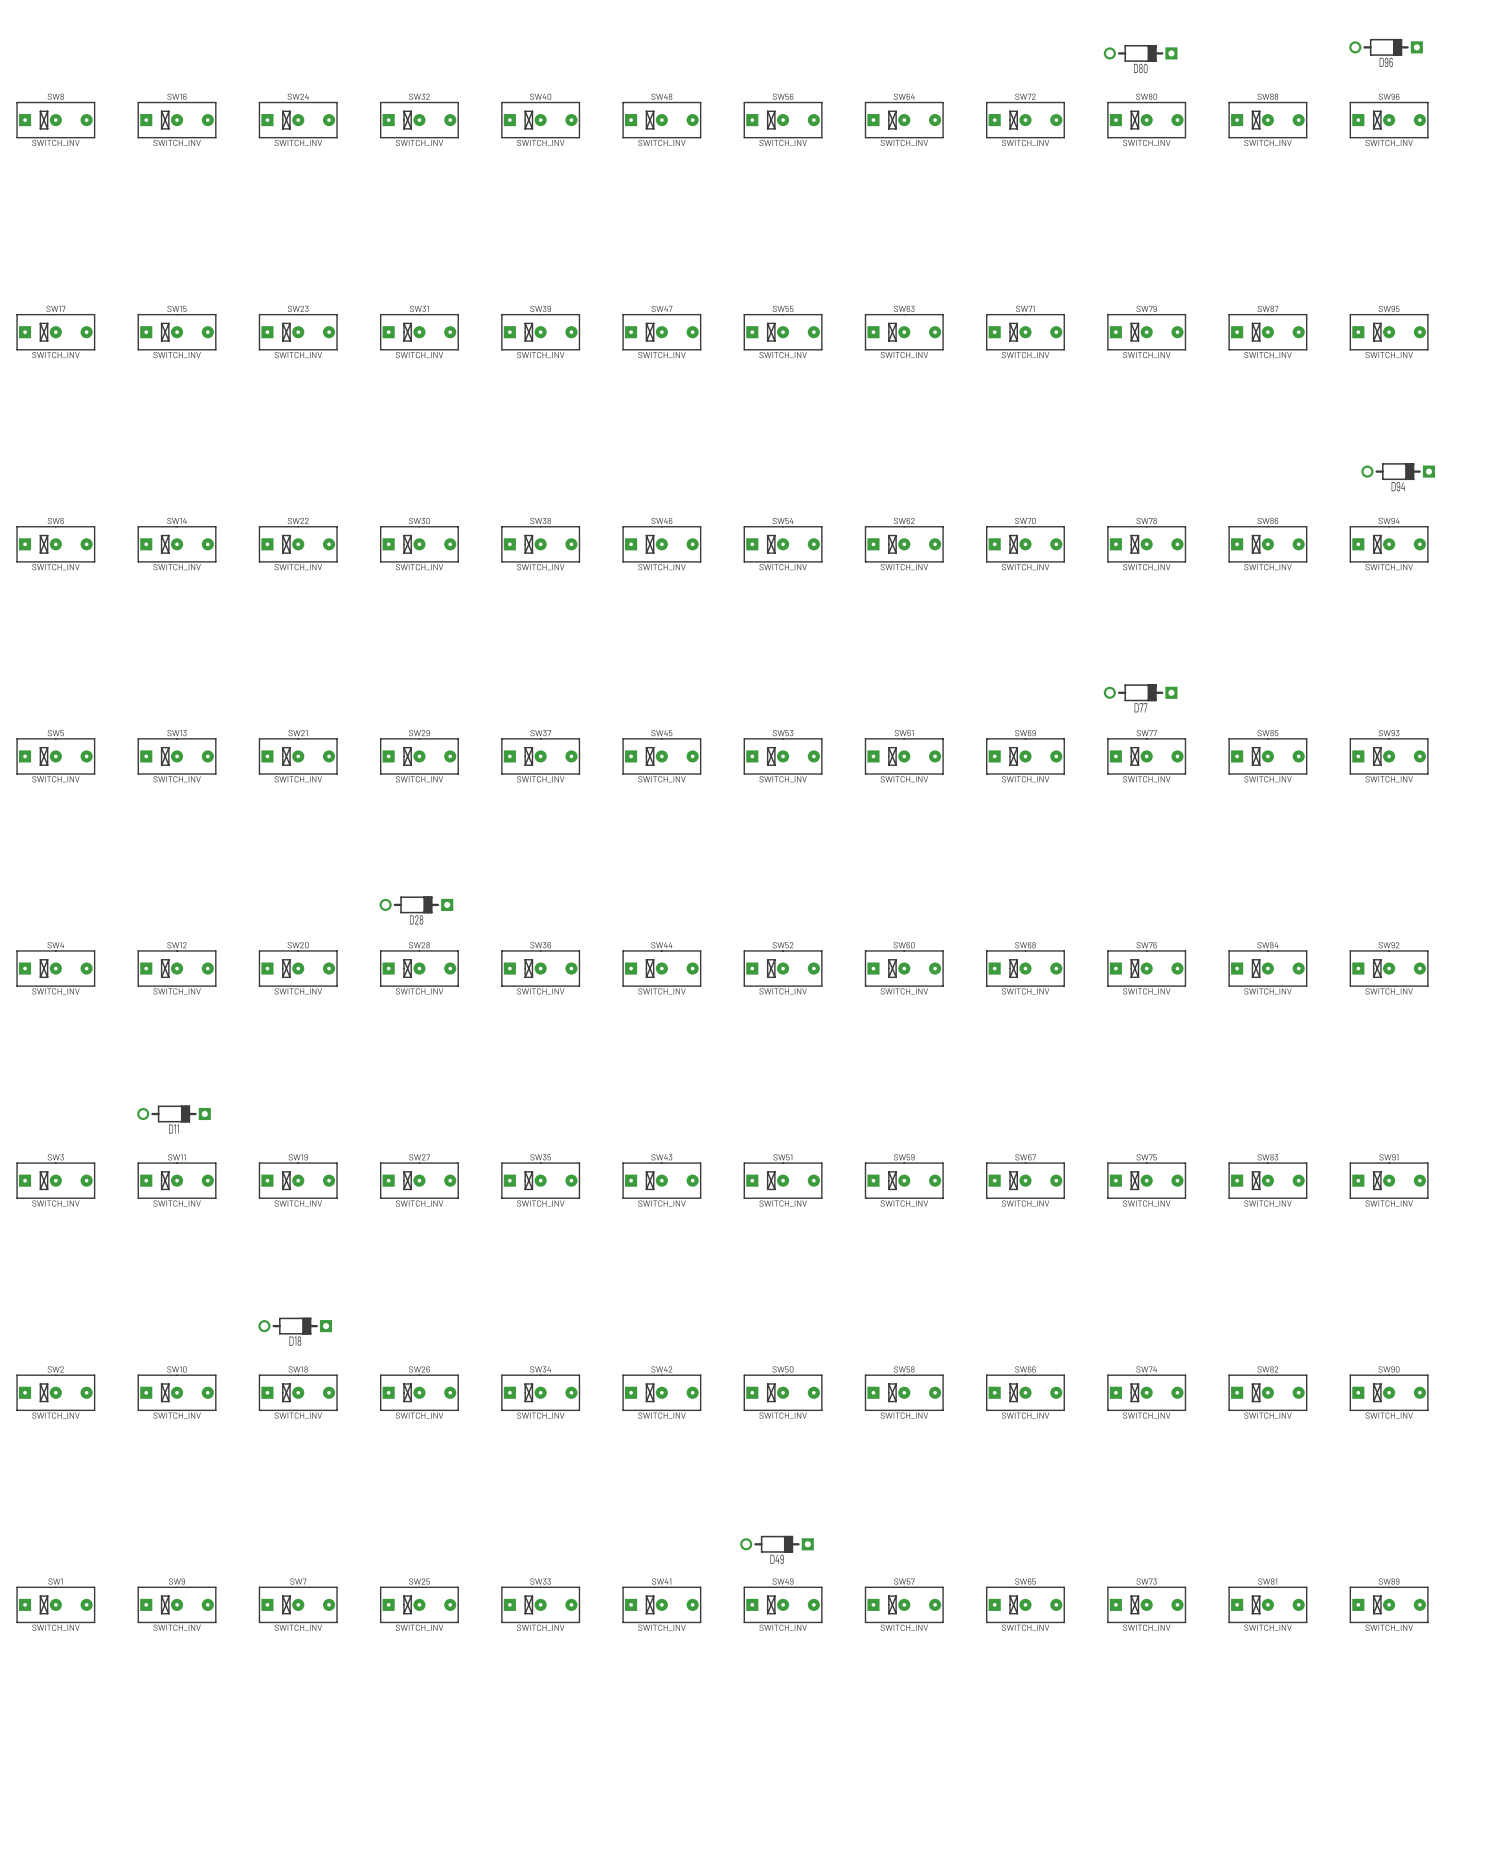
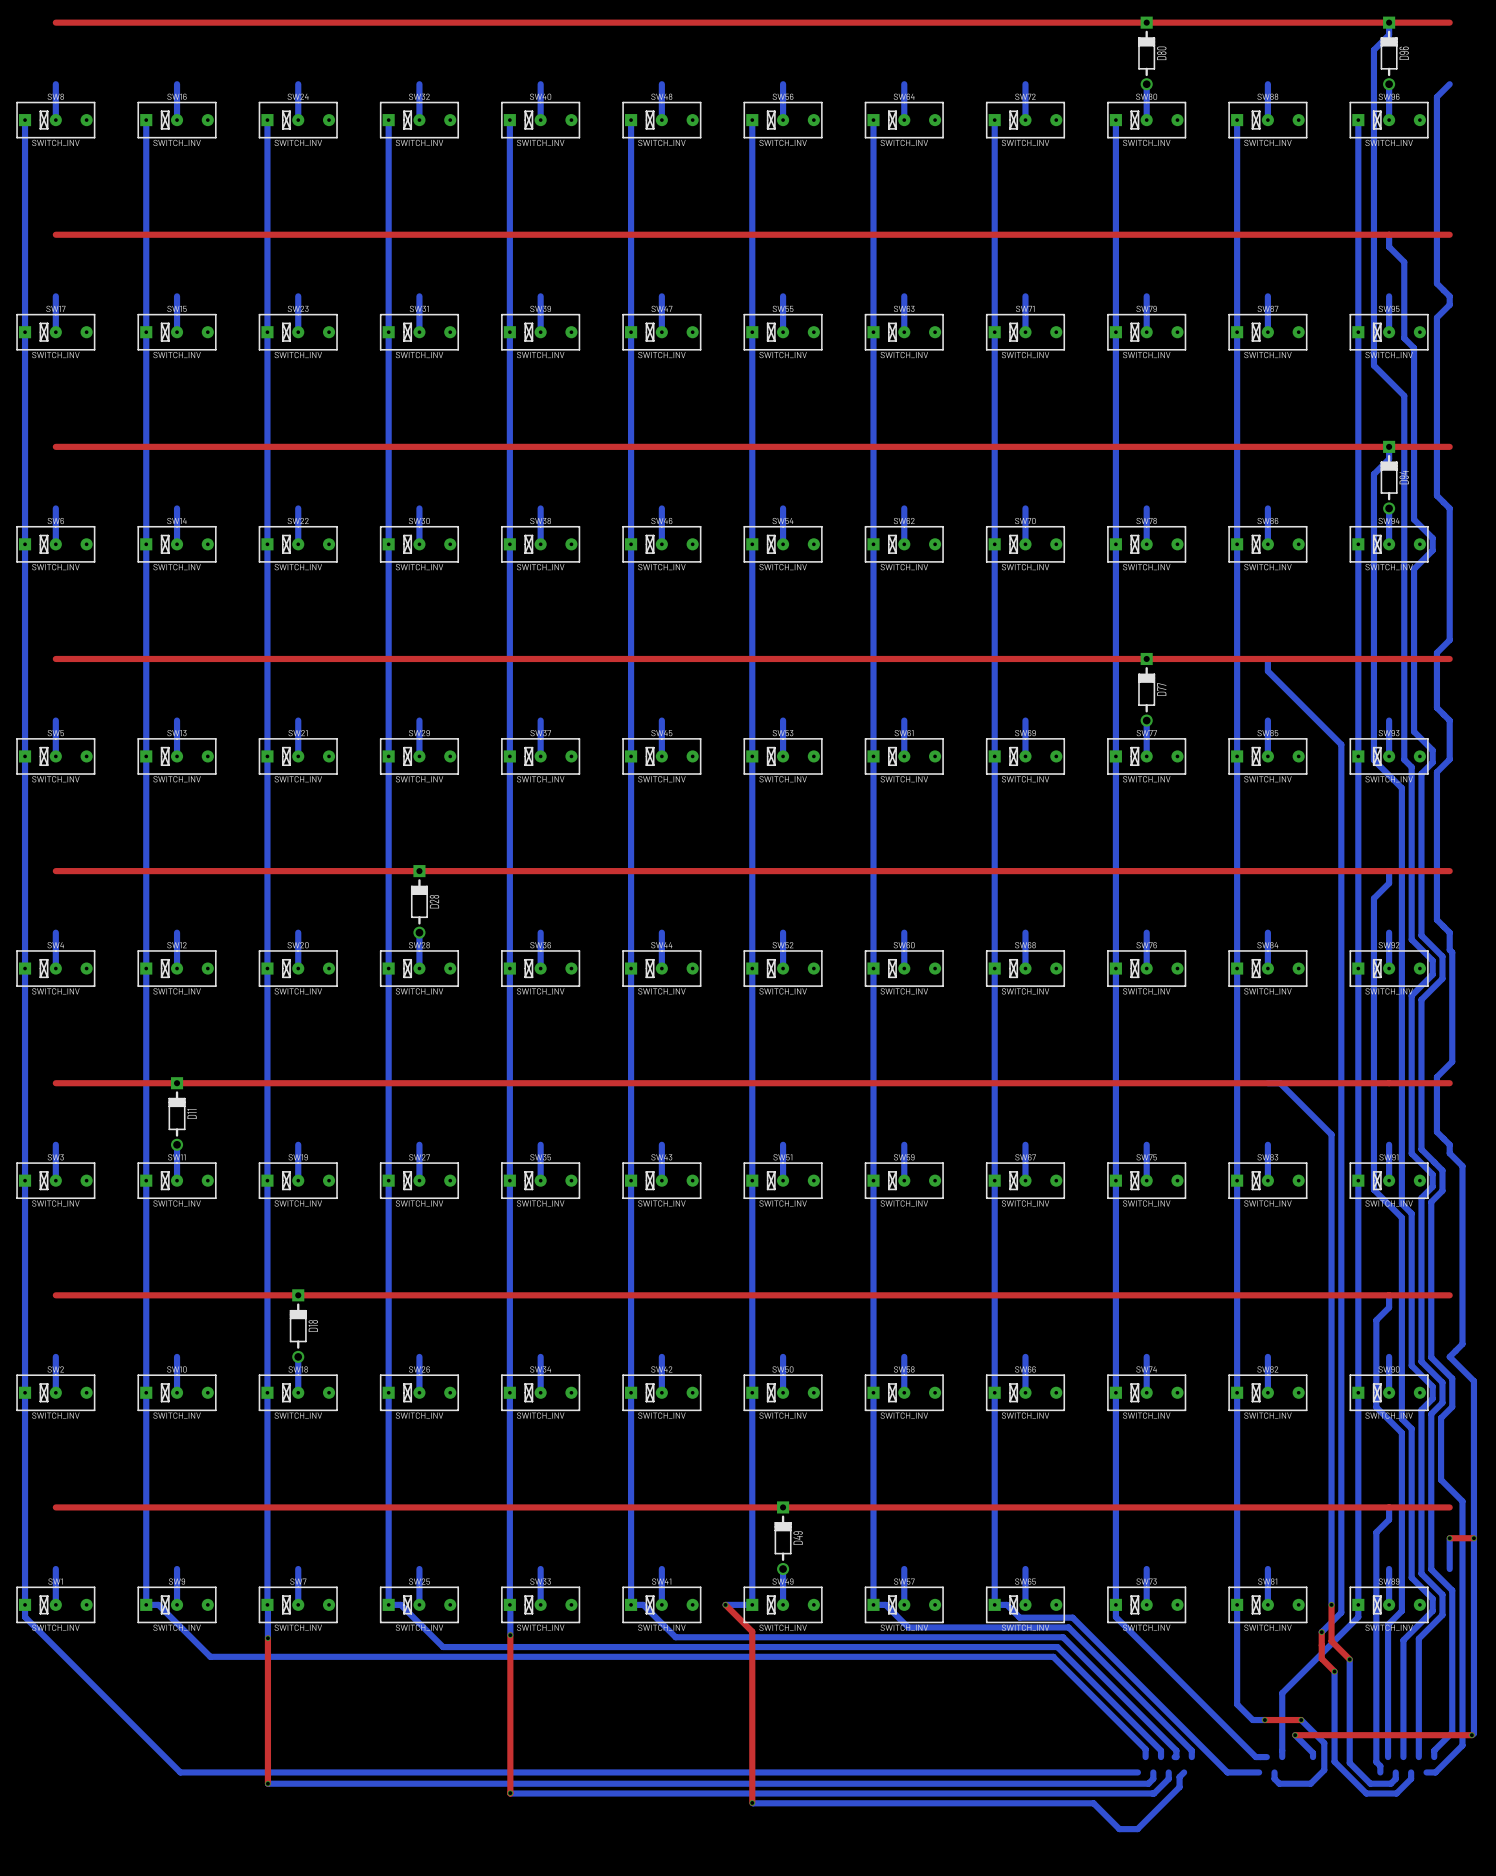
top track: none -> (55, 22) (1449, 22)
bottom track: none -> (1389, 22) (1389, 34) (1373, 50) (1373, 365) (1404, 395) (1404, 759) (1411, 767) (1411, 939) (1432, 960) (1432, 974) (1411, 995) (1411, 1153) (1432, 1174) (1432, 1186) (1421, 1197) (1421, 1361) (1442, 1382) (1442, 1402) (1431, 1414) (1431, 1569) (1452, 1590) (1452, 1732) (1434, 1750) (1434, 1757)
D96 rotation: 0° (1386, 47) -> 90° counterclockwise (1389, 53)
D80 rotation: 0° (1140, 53) -> 90° counterclockwise (1146, 53)
bottom track: none -> (55, 84) (55, 120)
bottom track: none -> (177, 84) (177, 120)
bottom track: none -> (298, 84) (298, 120)
bottom track: none -> (419, 84) (419, 120)
bottom track: none -> (540, 84) (540, 120)
bottom track: none -> (661, 84) (661, 120)
bottom track: none -> (783, 84) (783, 120)
bottom track: none -> (904, 84) (904, 120)
bottom track: none -> (1025, 84) (1025, 120)
bottom track: none -> (1146, 84) (1146, 120)
bottom track: none -> (1267, 84) (1267, 120)
bottom track: none -> (1389, 84) (1389, 120)
bottom track: none -> (1449, 84) (1436, 96) (1436, 283) (1449, 296) (1449, 304) (1436, 317) (1436, 495) (1449, 508) (1449, 640) (1436, 652) (1436, 707) (1449, 720) (1449, 759) (1436, 772) (1436, 919) (1449, 932) (1449, 949) (1452, 952) (1452, 1061) (1436, 1077) (1436, 1132) (1449, 1144) (1449, 1153) (1462, 1166) (1462, 1344) (1449, 1356) (1473, 1381) (1473, 1733) (1472, 1735)
bottom track: none -> (25, 120) (25, 1617) (180, 1772) (1137, 1772)
bottom track: none -> (146, 120) (146, 1604) (158, 1604) (210, 1656) (1053, 1656) (1145, 1749) (1145, 1757)
bottom track: none -> (267, 120) (267, 1638)
bottom track: none -> (388, 120) (388, 1604) (400, 1604) (443, 1647) (1057, 1647) (1161, 1750) (1161, 1757)
bottom track: none -> (509, 120) (510, 1635)
bottom track: none -> (631, 120) (631, 1604) (643, 1604) (675, 1637) (1063, 1637) (1176, 1750) (1176, 1757) (1174, 1757)
bottom track: none -> (752, 120) (752, 1604) (725, 1604)
bottom track: none -> (873, 120) (873, 1604) (885, 1604) (908, 1627) (1068, 1627) (1191, 1750) (1191, 1757)
bottom track: none -> (994, 120) (994, 1604) (1006, 1604) (1019, 1617) (1072, 1617) (1227, 1772) (1259, 1772)
bottom track: none -> (1115, 120) (1115, 1617) (1255, 1757) (1266, 1757)
bottom track: none -> (1237, 120) (1237, 1704) (1252, 1720) (1264, 1720)
bottom track: none -> (1358, 120) (1358, 1617) (1282, 1693) (1282, 1757)
top track: none -> (55, 234) (1449, 234)
bottom track: none -> (1389, 234) (1389, 246) (1404, 262) (1404, 338) (1414, 348) (1414, 519) (1432, 538) (1432, 550) (1414, 569) (1414, 731) (1432, 750) (1432, 762) (1421, 773) (1421, 935) (1442, 956) (1442, 978) (1421, 999) (1421, 1149) (1434, 1162)
bottom track: none -> (55, 296) (55, 332)
bottom track: none -> (177, 296) (177, 332)
bottom track: none -> (298, 296) (298, 332)
bottom track: none -> (419, 296) (419, 332)
bottom track: none -> (540, 296) (540, 332)
bottom track: none -> (661, 296) (661, 332)
bottom track: none -> (783, 296) (783, 332)
bottom track: none -> (904, 296) (904, 332)
bottom track: none -> (1025, 296) (1025, 332)
bottom track: none -> (1146, 296) (1146, 332)
bottom track: none -> (1267, 296) (1267, 332)
bottom track: none -> (1389, 296) (1389, 332)
top track: none -> (55, 446) (1449, 446)
bottom track: none -> (1389, 446) (1389, 459) (1373, 474) (1373, 760) (1401, 788) (1401, 1203) (1411, 1213) (1411, 1365) (1432, 1386) (1432, 1398) (1421, 1409) (1421, 1573) (1442, 1594) (1442, 1615) (1418, 1638) (1418, 1757)
D94 rotation: 0° (1398, 471) -> 90° counterclockwise (1389, 477)
bottom track: none -> (55, 508) (55, 544)
bottom track: none -> (177, 508) (177, 544)
bottom track: none -> (298, 508) (298, 544)
bottom track: none -> (419, 508) (419, 544)
bottom track: none -> (540, 508) (540, 544)
bottom track: none -> (661, 508) (661, 544)
bottom track: none -> (783, 508) (783, 544)
bottom track: none -> (904, 508) (904, 544)
bottom track: none -> (1025, 508) (1025, 544)
bottom track: none -> (1146, 508) (1146, 544)
bottom track: none -> (1267, 508) (1267, 544)
bottom track: none -> (1389, 508) (1389, 544)
top track: none -> (55, 658) (1449, 658)
bottom track: none -> (1267, 658) (1267, 671) (1341, 744) (1341, 1612) (1321, 1632)
D77 rotation: 0° (1140, 692) -> 90° counterclockwise (1146, 689)
bottom track: none -> (55, 720) (55, 756)
bottom track: none -> (177, 720) (177, 756)
bottom track: none -> (298, 720) (298, 756)
bottom track: none -> (419, 720) (419, 756)
bottom track: none -> (540, 720) (540, 756)
bottom track: none -> (661, 720) (661, 756)
bottom track: none -> (783, 720) (783, 756)
bottom track: none -> (904, 720) (904, 756)
bottom track: none -> (1025, 720) (1025, 756)
bottom track: none -> (1146, 720) (1146, 756)
bottom track: none -> (1267, 720) (1267, 756)
bottom track: none -> (1389, 720) (1389, 756)
top track: none -> (55, 871) (1449, 871)
bottom track: none -> (1389, 871) (1389, 883) (1373, 898) (1373, 1189) (1401, 1217) (1401, 1418) (1411, 1428) (1411, 1577) (1432, 1598) (1432, 1611) (1403, 1640) (1403, 1757)
D28 rotation: 0° (416, 904) -> 90° counterclockwise (419, 901)
bottom track: none -> (55, 932) (55, 968)
bottom track: none -> (177, 932) (177, 968)
bottom track: none -> (298, 932) (298, 968)
bottom track: none -> (419, 932) (419, 968)
bottom track: none -> (540, 932) (540, 968)
bottom track: none -> (661, 932) (661, 968)
bottom track: none -> (783, 932) (783, 968)
bottom track: none -> (904, 932) (904, 968)
bottom track: none -> (1025, 932) (1025, 968)
bottom track: none -> (1146, 932) (1146, 968)
bottom track: none -> (1267, 932) (1267, 968)
bottom track: none -> (1389, 932) (1389, 968)
top track: none -> (55, 1083) (1449, 1083)
bottom track: none -> (1267, 1083) (1280, 1083) (1331, 1134) (1331, 1604)
D11 rotation: 0° (174, 1113) -> 90° counterclockwise (177, 1113)
bottom track: none -> (55, 1144) (55, 1180)
bottom track: none -> (177, 1144) (177, 1180)
bottom track: none -> (298, 1144) (298, 1180)
bottom track: none -> (419, 1144) (419, 1180)
bottom track: none -> (540, 1144) (540, 1180)
bottom track: none -> (661, 1144) (661, 1180)
bottom track: none -> (783, 1144) (783, 1180)
bottom track: none -> (904, 1144) (904, 1180)
bottom track: none -> (1025, 1144) (1025, 1180)
bottom track: none -> (1146, 1144) (1146, 1180)
bottom track: none -> (1267, 1144) (1267, 1180)
bottom track: none -> (1389, 1144) (1389, 1180)
bottom track: none -> (1434, 1162) (1442, 1170) (1442, 1190) (1431, 1202) (1431, 1357) (1452, 1378) (1452, 1406) (1441, 1418) (1441, 1479) (1462, 1501) (1462, 1745) (1435, 1772) (1426, 1772)
top track: none -> (55, 1295) (1449, 1295)
bottom track: none -> (1389, 1295) (1389, 1307) (1376, 1320) (1376, 1407) (1401, 1432) (1401, 1611) (1388, 1624) (1388, 1757)
D18 rotation: 0° (295, 1326) -> 90° counterclockwise (298, 1326)
bottom track: none -> (55, 1356) (55, 1392)
bottom track: none -> (177, 1356) (177, 1392)
bottom track: none -> (298, 1356) (298, 1392)
bottom track: none -> (419, 1356) (419, 1392)
bottom track: none -> (540, 1356) (540, 1392)
bottom track: none -> (661, 1356) (661, 1392)
bottom track: none -> (783, 1356) (783, 1392)
bottom track: none -> (904, 1356) (904, 1392)
bottom track: none -> (1025, 1356) (1025, 1392)
bottom track: none -> (1146, 1356) (1146, 1392)
bottom track: none -> (1267, 1356) (1267, 1392)
bottom track: none -> (1389, 1356) (1389, 1392)
top track: none -> (55, 1507) (1449, 1507)
bottom track: none -> (1389, 1507) (1389, 1519) (1376, 1532) (1376, 1762) (1380, 1766) (1380, 1772)
bottom track: none -> (1449, 1538) (1449, 1569)
top track: none -> (1449, 1538) (1473, 1538)
via: none -> (1449, 1538)
via: none -> (1473, 1538)
D49 rotation: 0° (777, 1544) -> 90° counterclockwise (783, 1538)
bottom track: none -> (55, 1569) (55, 1604)
bottom track: none -> (177, 1569) (177, 1604)
bottom track: none -> (298, 1569) (298, 1604)
bottom track: none -> (419, 1569) (419, 1604)
bottom track: none -> (540, 1569) (540, 1604)
bottom track: none -> (661, 1569) (661, 1604)
bottom track: none -> (783, 1569) (783, 1604)
bottom track: none -> (904, 1569) (904, 1604)
bottom track: none -> (1025, 1569) (1025, 1604)
bottom track: none -> (1146, 1569) (1146, 1604)
bottom track: none -> (1267, 1569) (1267, 1604)
bottom track: none -> (1389, 1569) (1389, 1604)
top track: none -> (725, 1604) (752, 1631) (752, 1802)
via: none -> (725, 1604)
top track: none -> (1331, 1604) (1331, 1641) (1349, 1659)
via: none -> (1331, 1604)
top track: none -> (1321, 1632) (1321, 1658) (1334, 1671)
via: none -> (1321, 1632)
top track: none -> (510, 1635) (510, 1793)
via: none -> (510, 1635)
top track: none -> (267, 1638) (267, 1783)
via: none -> (267, 1638)
bottom track: none -> (1349, 1659) (1349, 1763) (1370, 1783) (1390, 1783) (1395, 1778) (1395, 1772)
via: none -> (1349, 1659)
bottom track: none -> (1334, 1671) (1334, 1761) (1366, 1793) (1396, 1793) (1411, 1778) (1411, 1772)
via: none -> (1334, 1671)
top track: none -> (1264, 1720) (1301, 1720)
via: none -> (1264, 1720)
bottom track: none -> (1301, 1720) (1324, 1743) (1324, 1770) (1310, 1783) (1279, 1783) (1274, 1778) (1274, 1772)
via: none -> (1301, 1720)
bottom track: none -> (1295, 1735) (1313, 1753) (1313, 1757)
top track: none -> (1295, 1735) (1471, 1735)
via: none -> (1295, 1735)
via: none -> (1471, 1735)
bottom track: none -> (1153, 1772) (1153, 1778) (1148, 1783) (267, 1783)
bottom track: none -> (1168, 1772) (1168, 1778) (1154, 1793) (510, 1793)
bottom track: none -> (1184, 1772) (1179, 1777) (1179, 1787) (1137, 1829) (1119, 1829) (1093, 1803) (752, 1803)
via: none -> (267, 1783)
via: none -> (510, 1793)
via: none -> (752, 1802)

